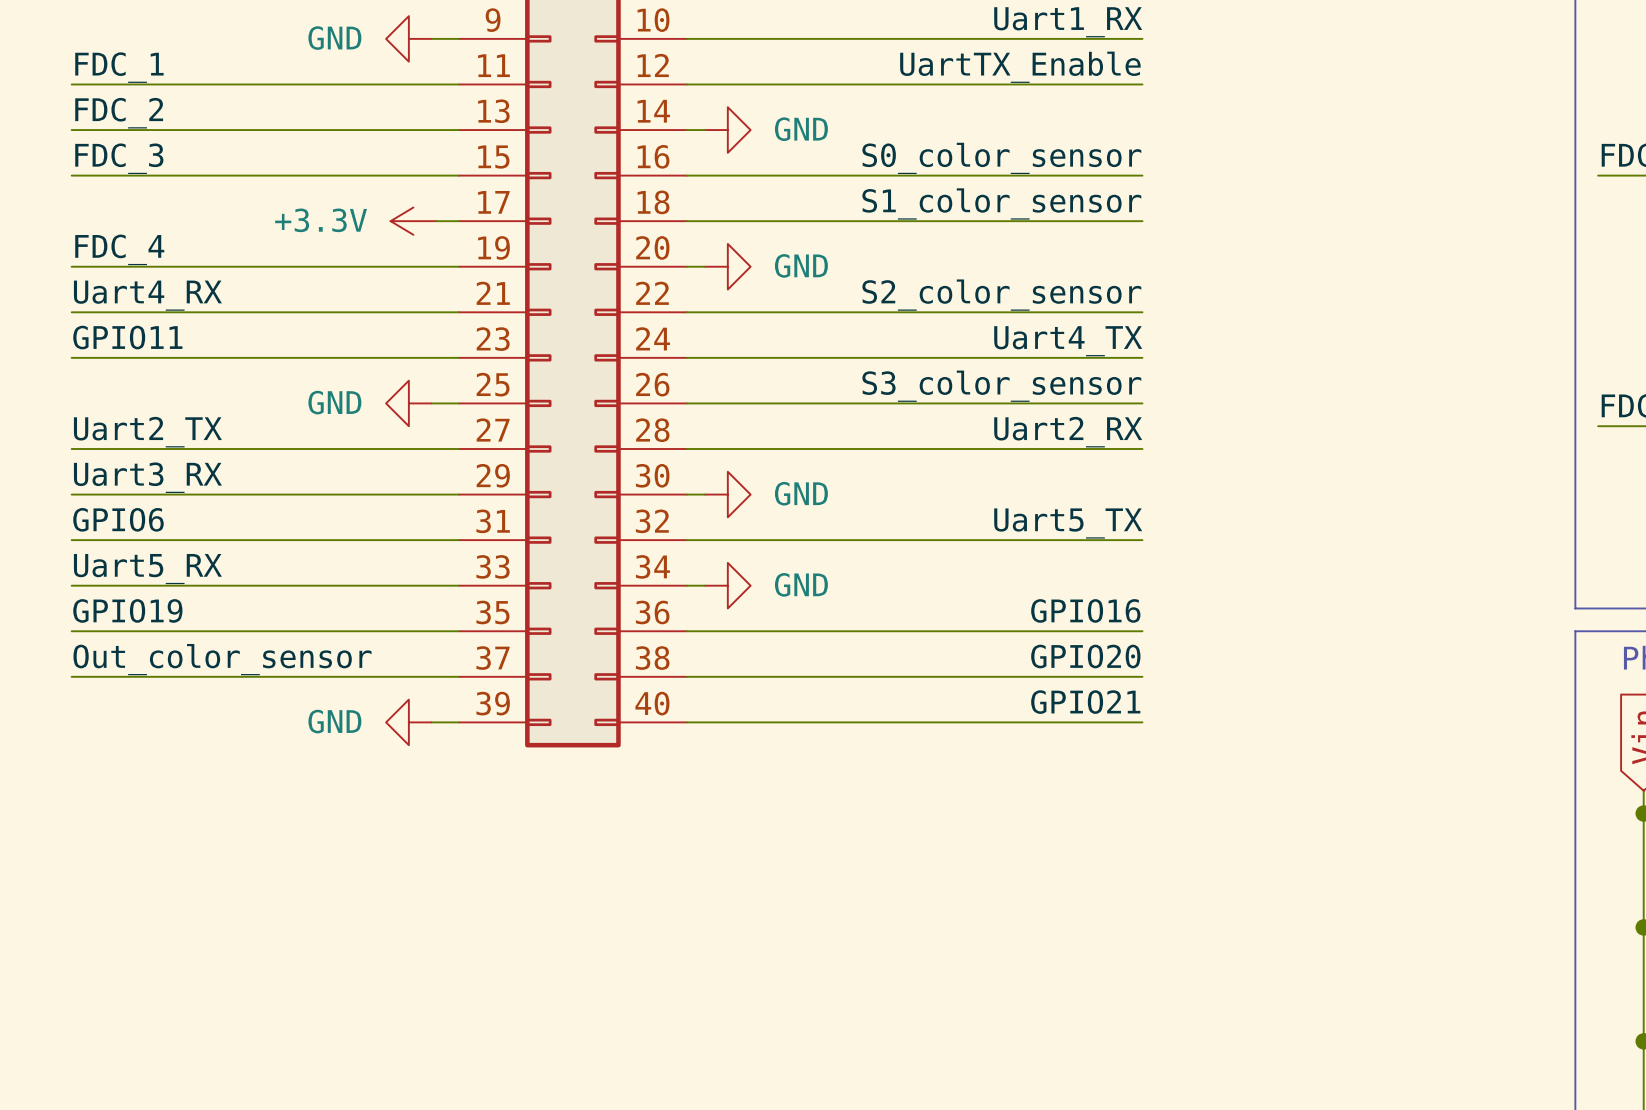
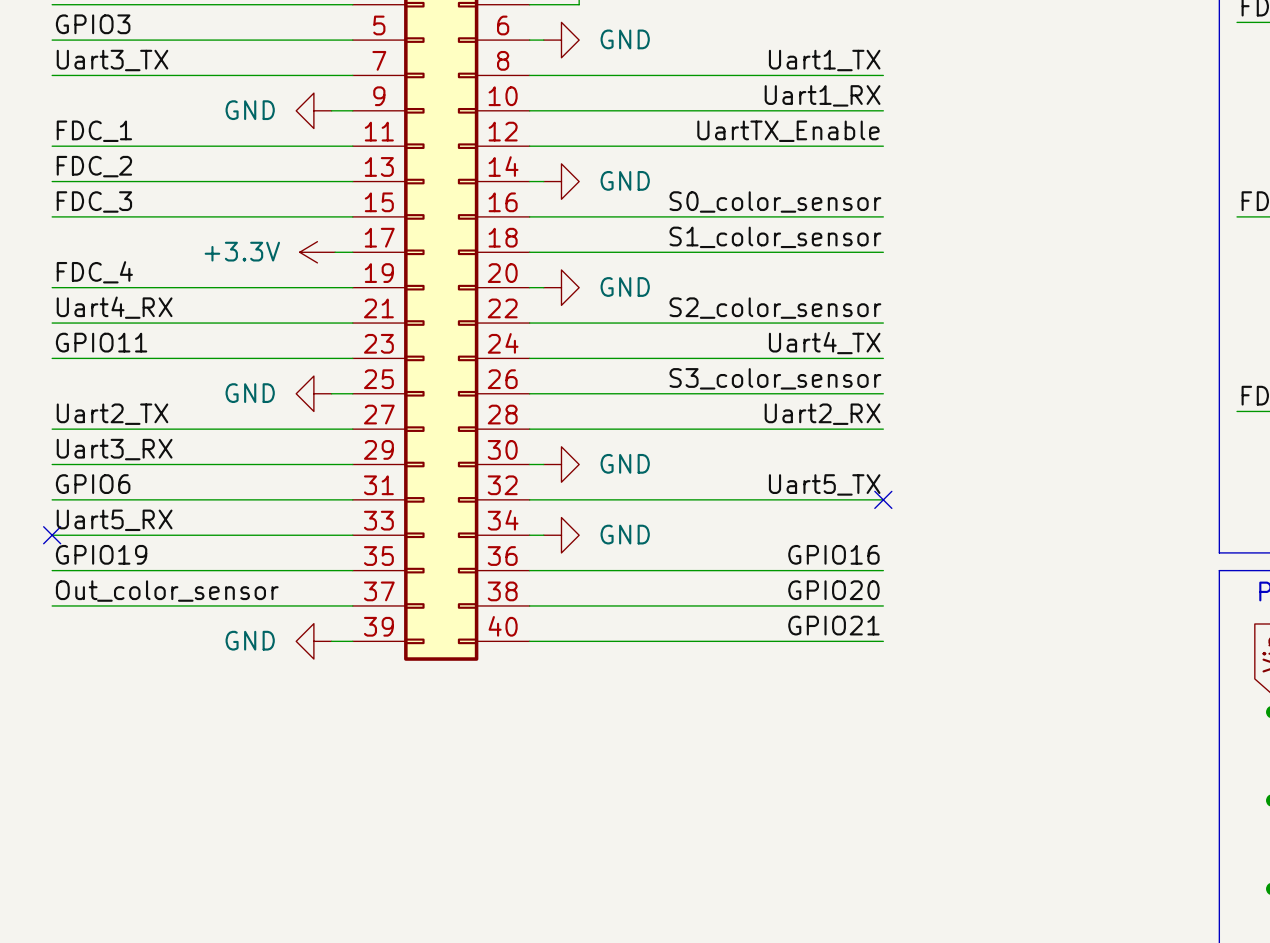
no-connect mark: none -> (883, 499)
no-connect mark: none -> (52, 535)

